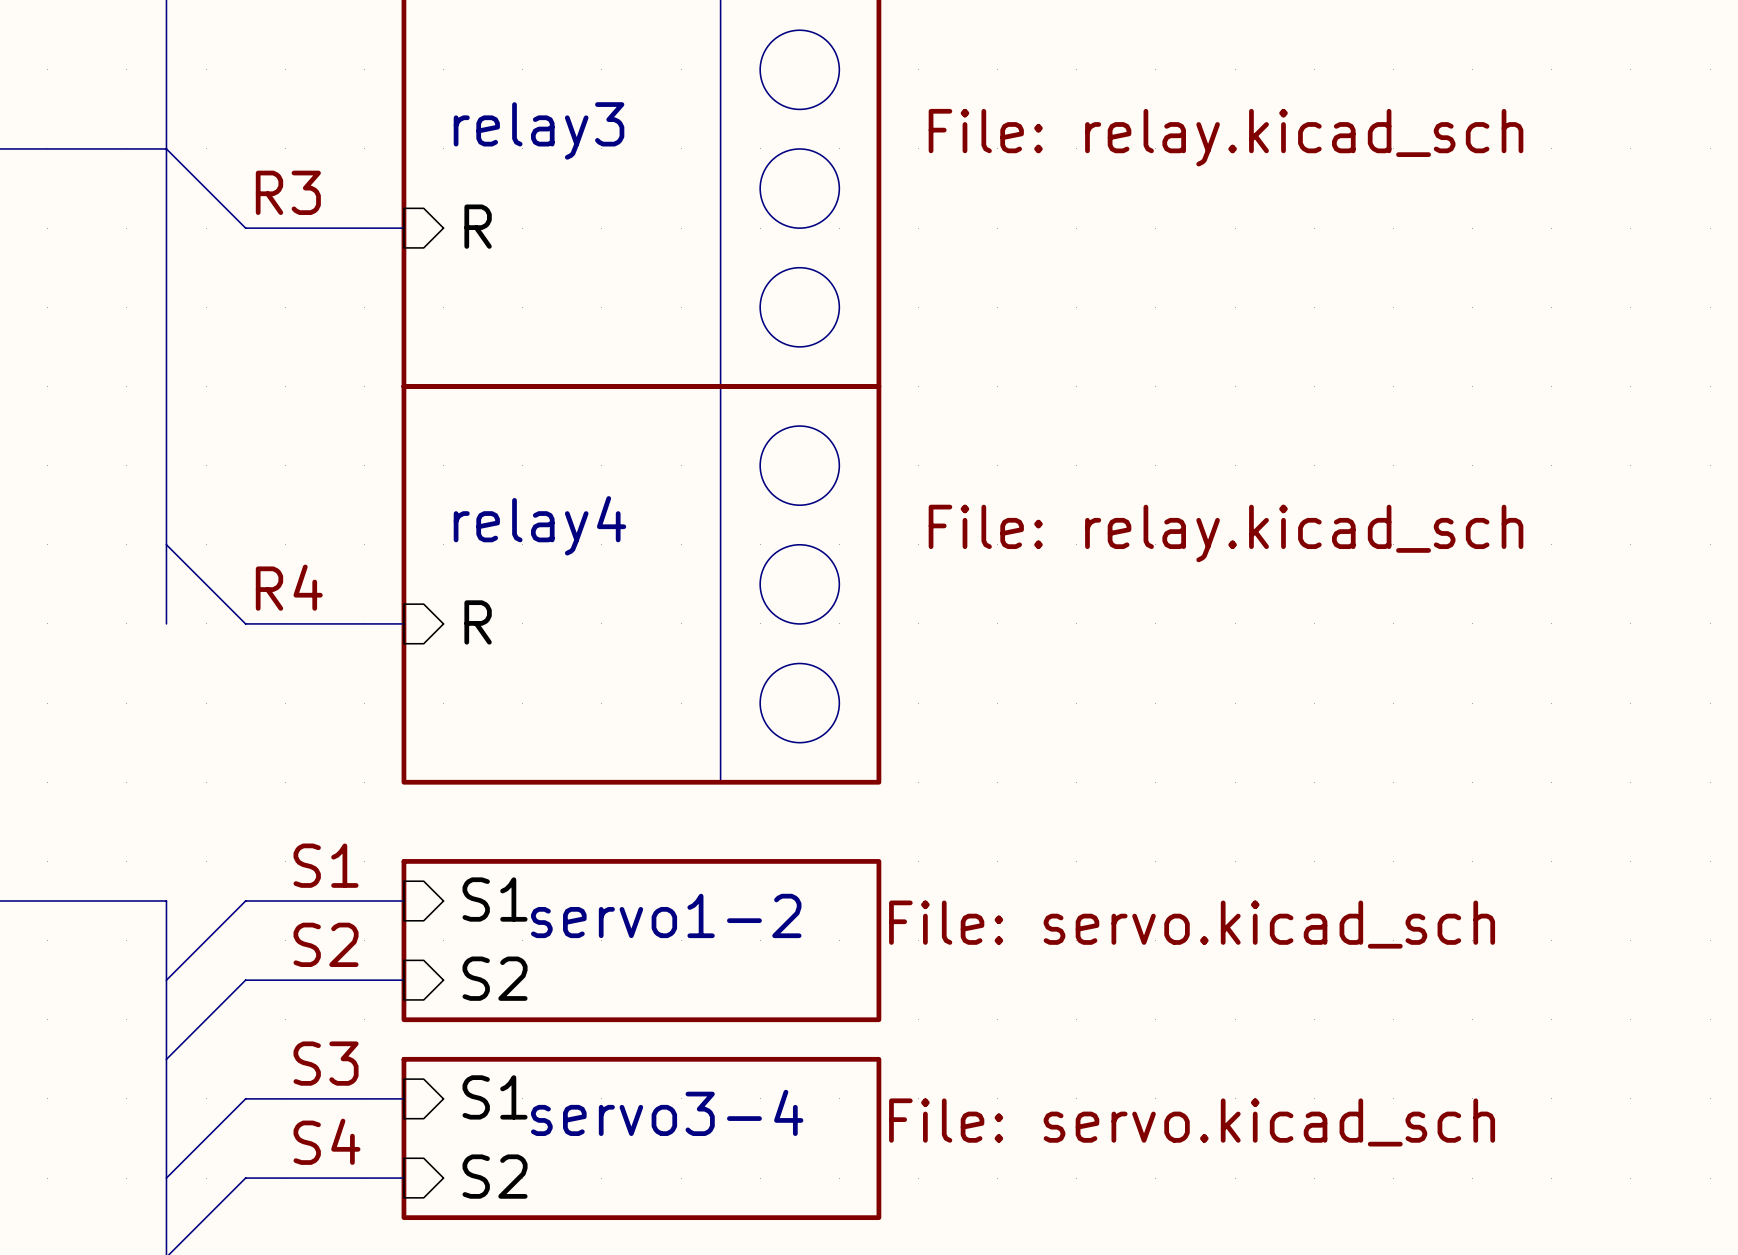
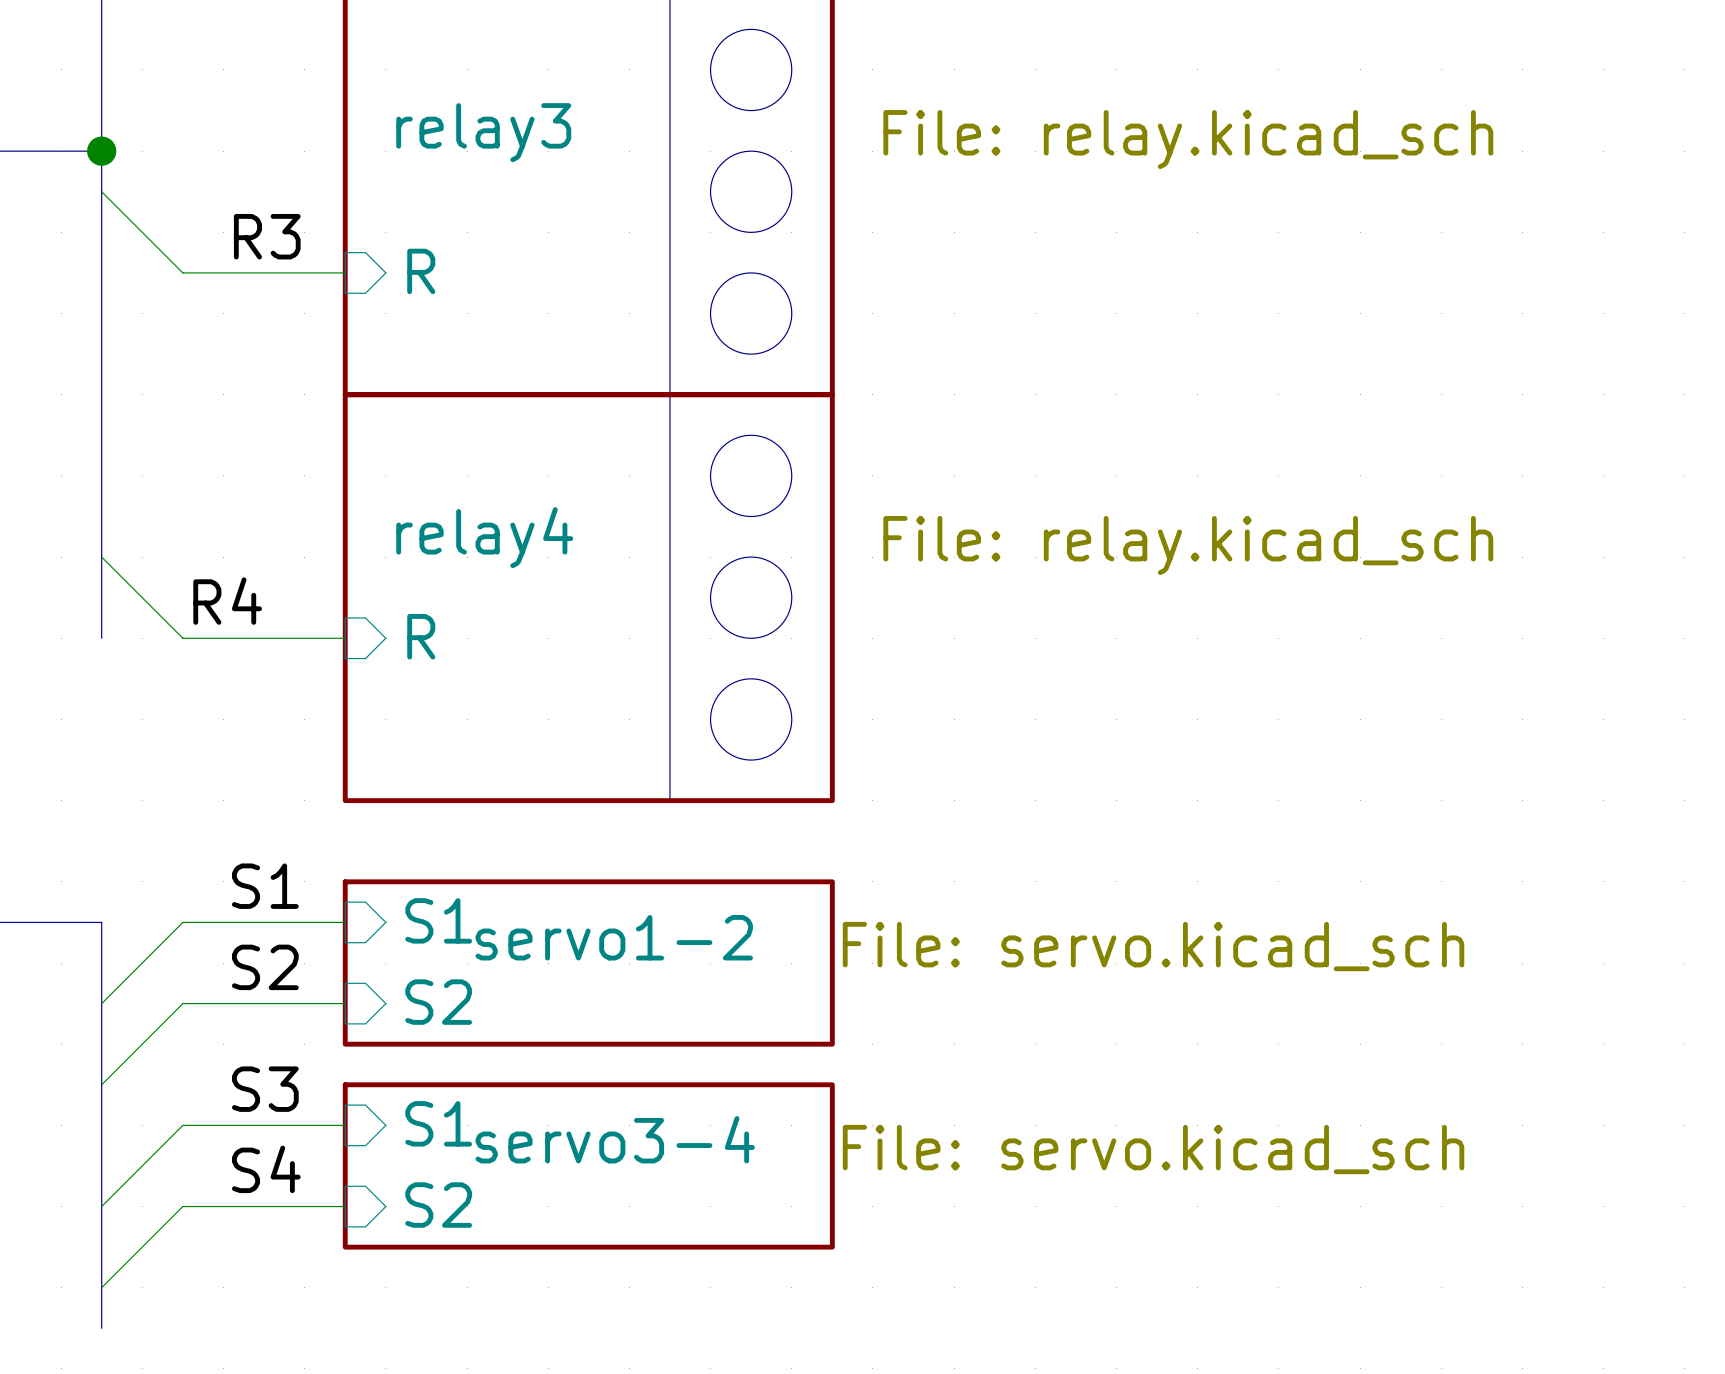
wire: (166, 148) (245, 228) (403, 228) -> (101, 191) (182, 272) (345, 272)
junction: none -> (101, 151)
label position: R3 (288, 192) -> R3 (267, 236)
sheet pin position: R (478, 226) -> R (421, 271)

